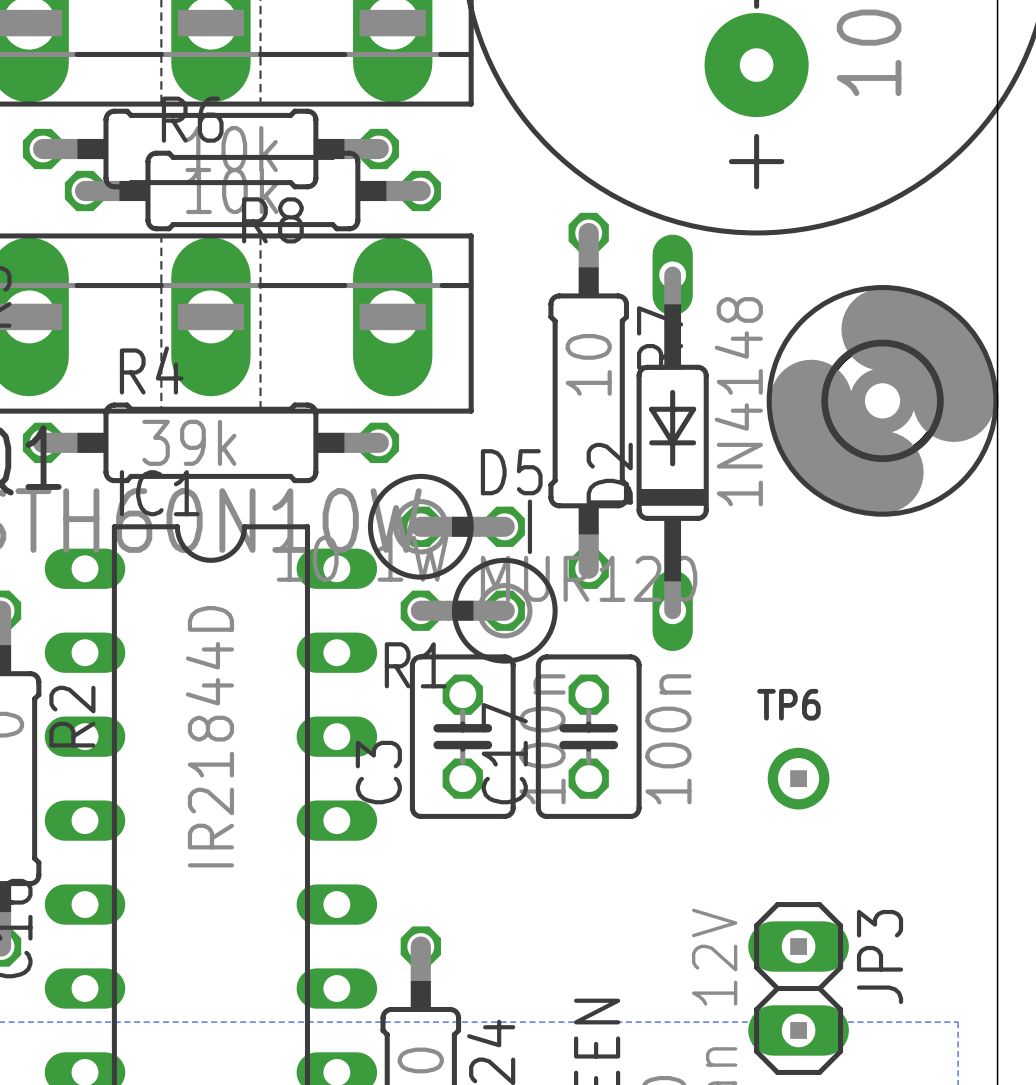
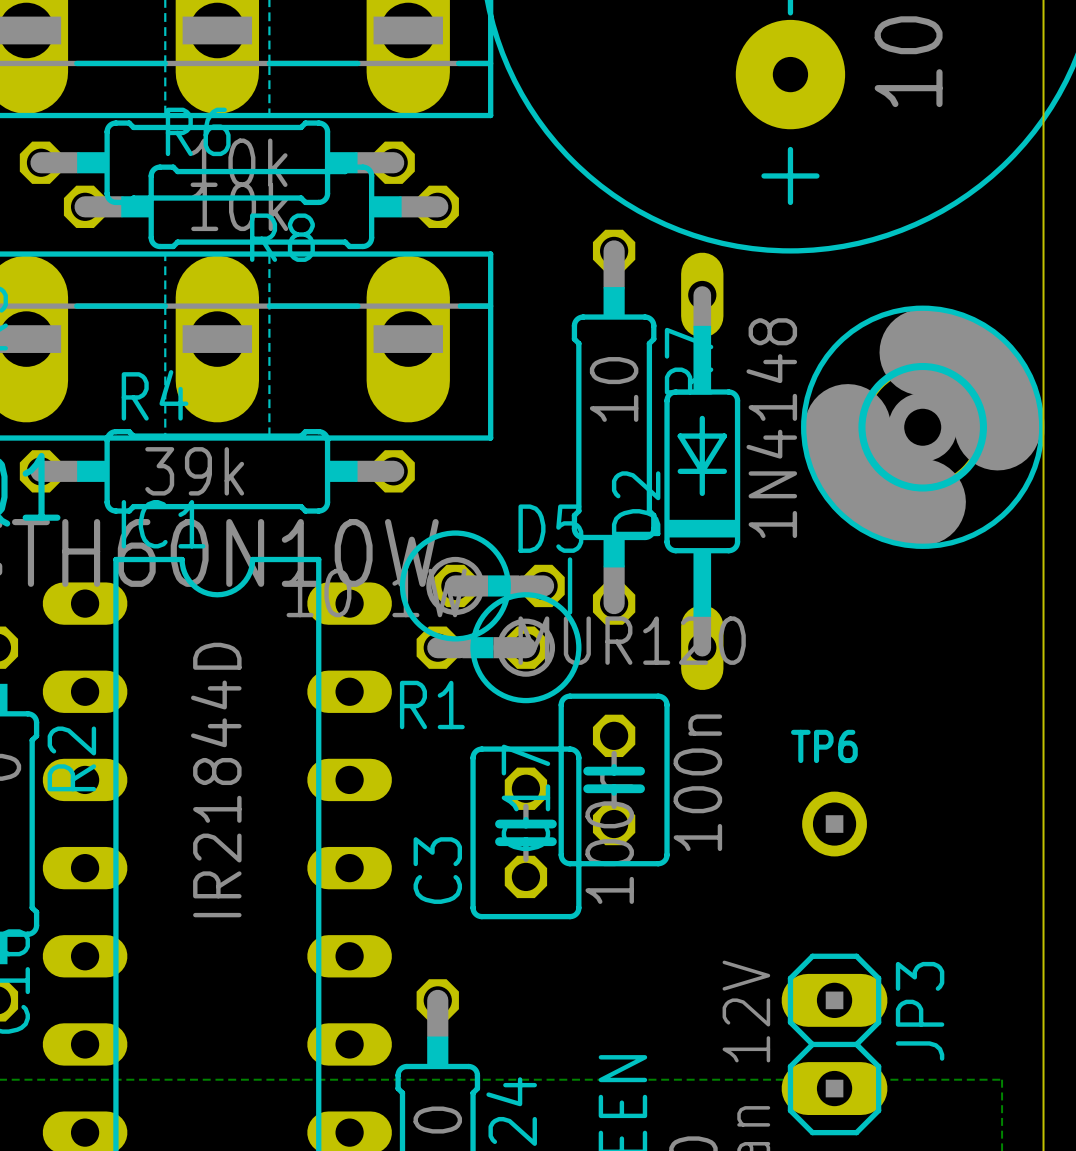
D5 position: (449, 526) -> (486, 585)
C3 position: (462, 736) -> (525, 832)

